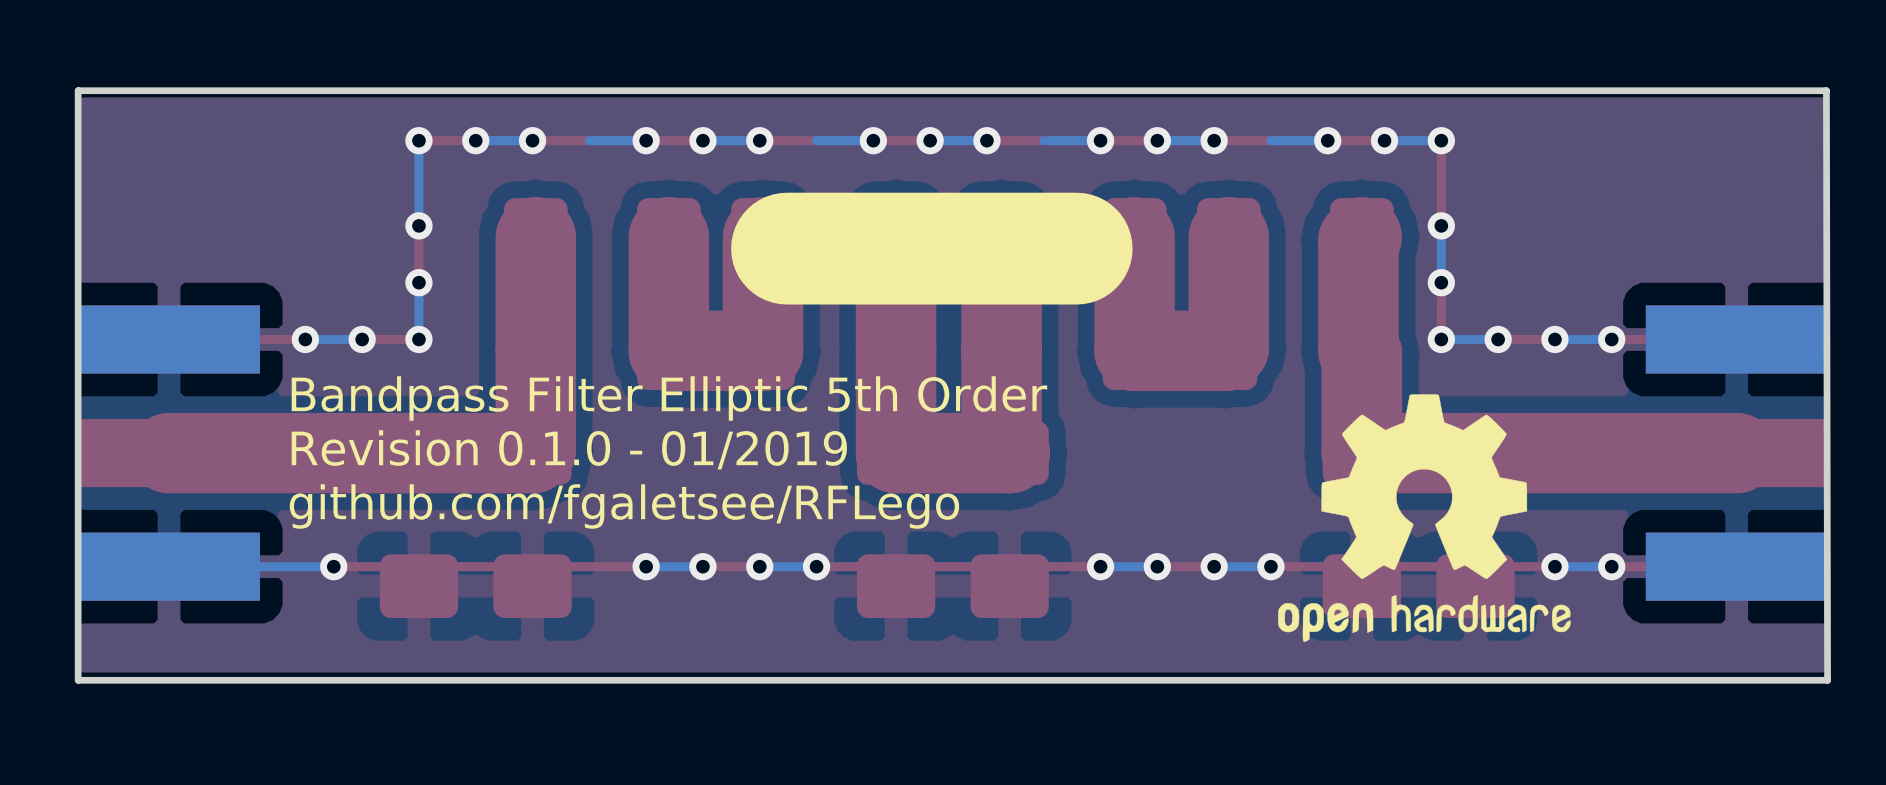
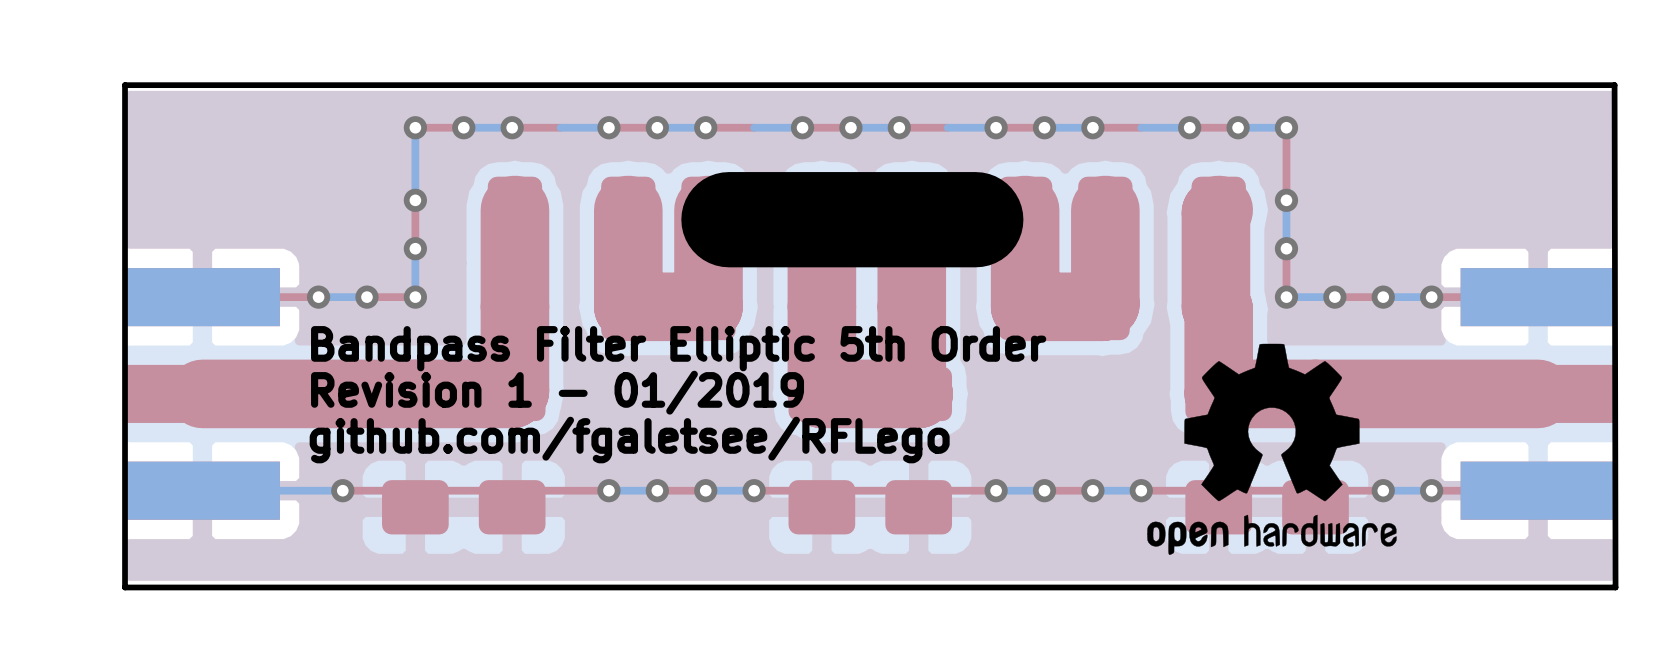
text: Revision 0.1.0 - 01/2019 (569, 449) -> Revision 1 - 01/2019 (557, 392)

